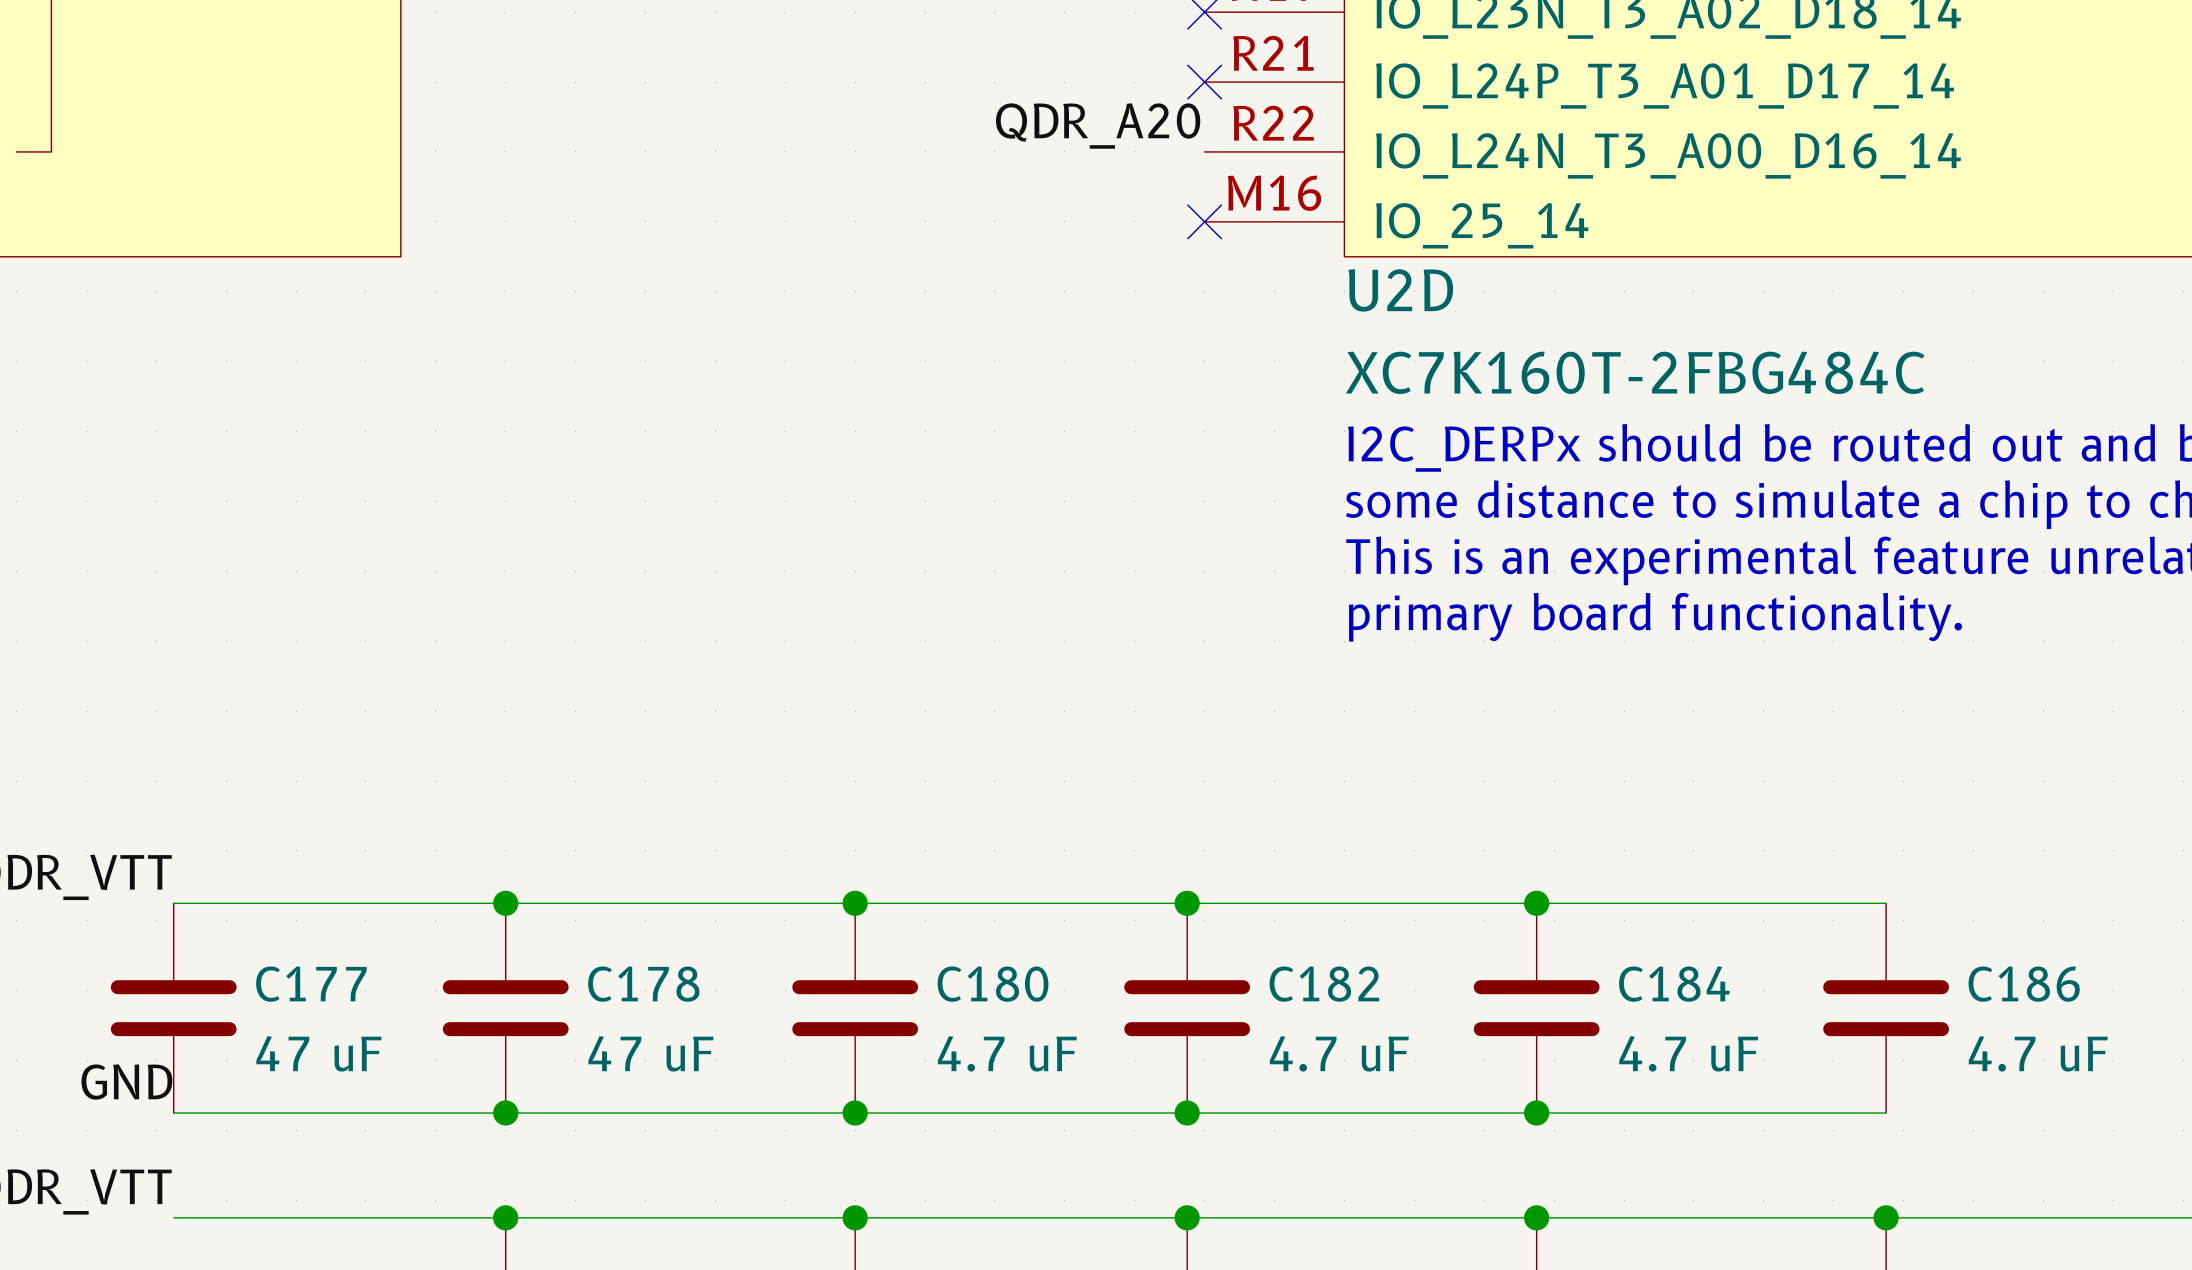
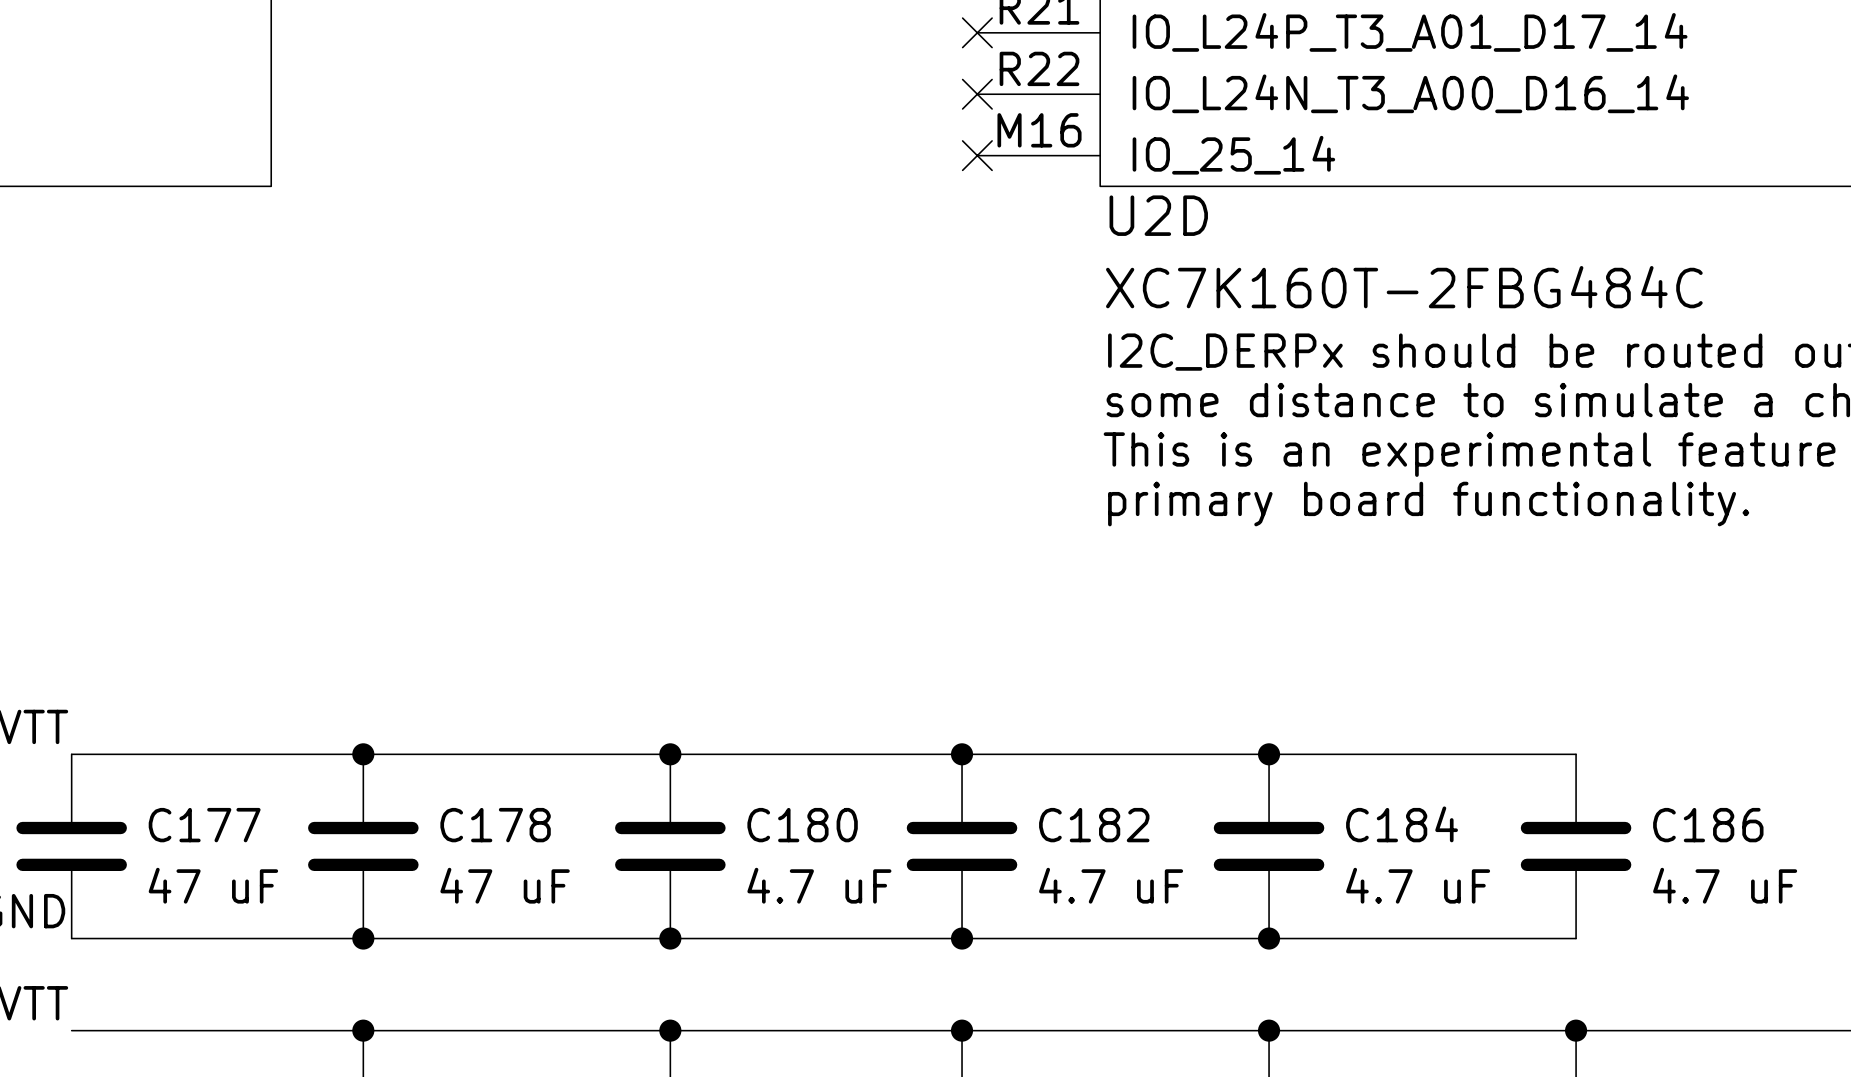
label: QDR_A20 (1098, 126) -> none
no-connect mark: none -> (977, 94)

